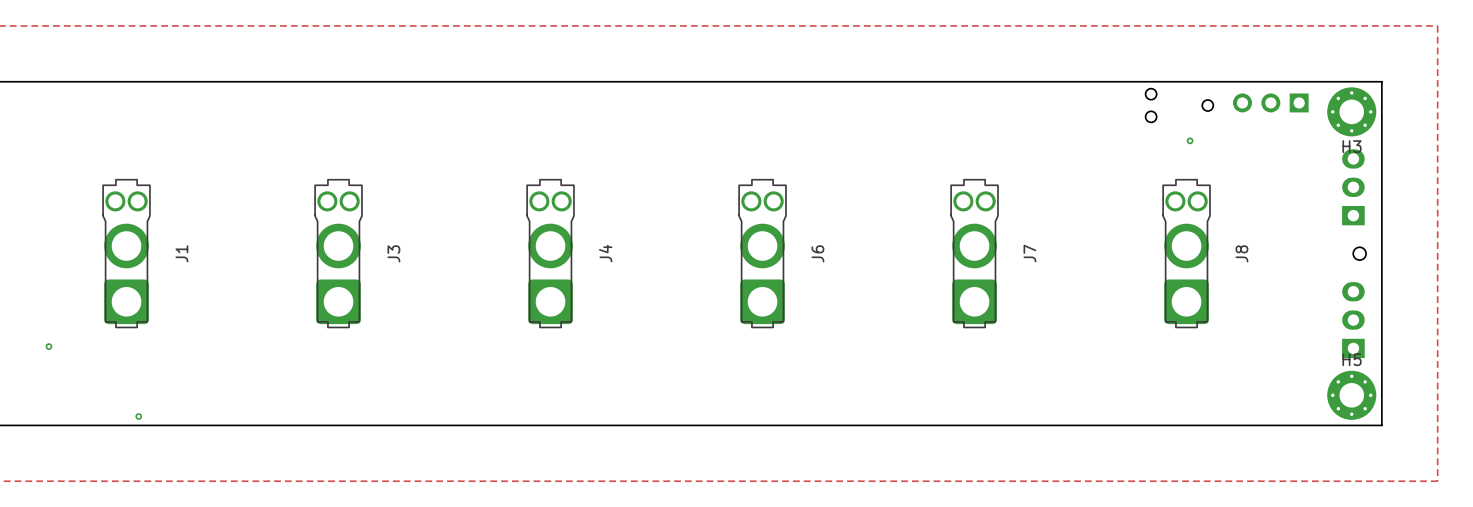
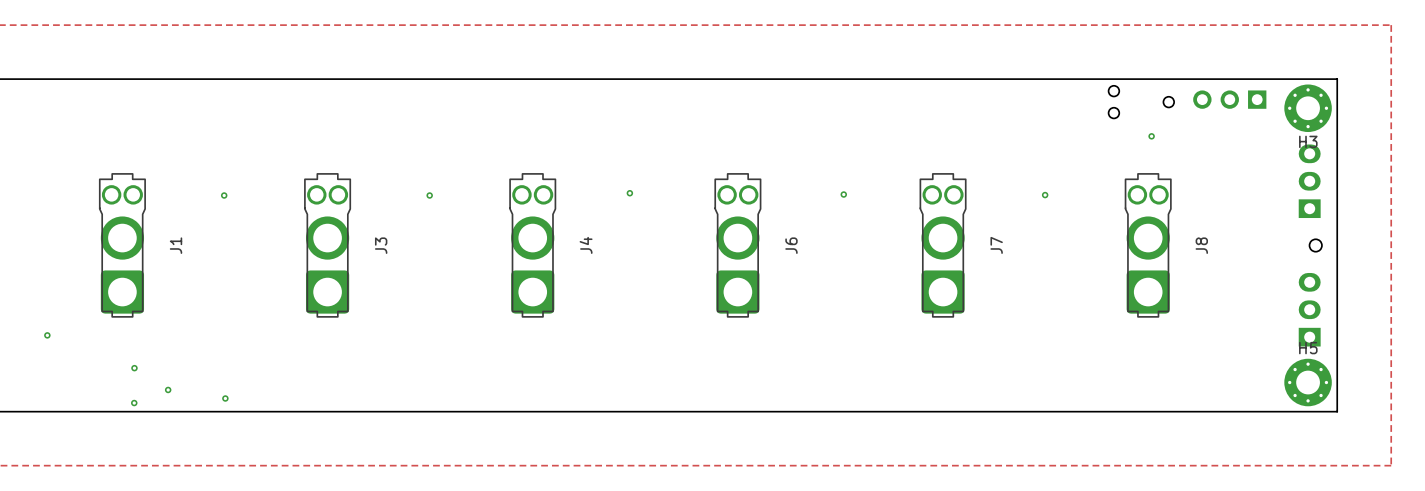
via: none -> (629, 193)
via: none -> (843, 194)
via: none -> (1045, 195)
via: none -> (224, 195)
via: none -> (429, 195)
via: none -> (134, 368)
via: none -> (168, 389)
via: none -> (225, 398)

